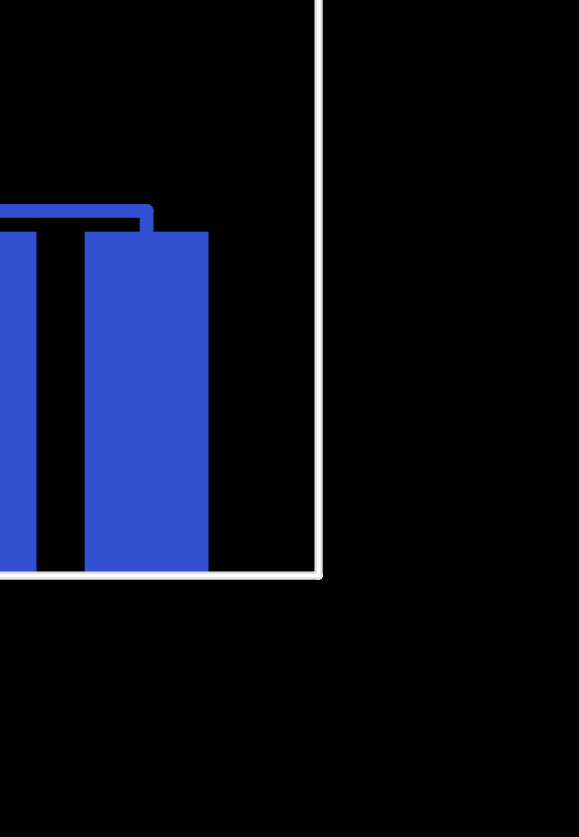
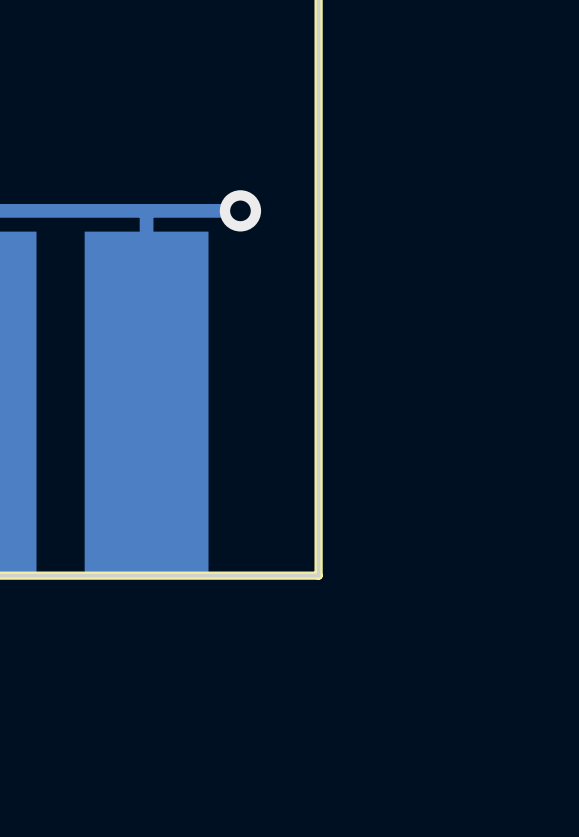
track: none -> (240, 210) (146, 210)
via: none -> (240, 210)

